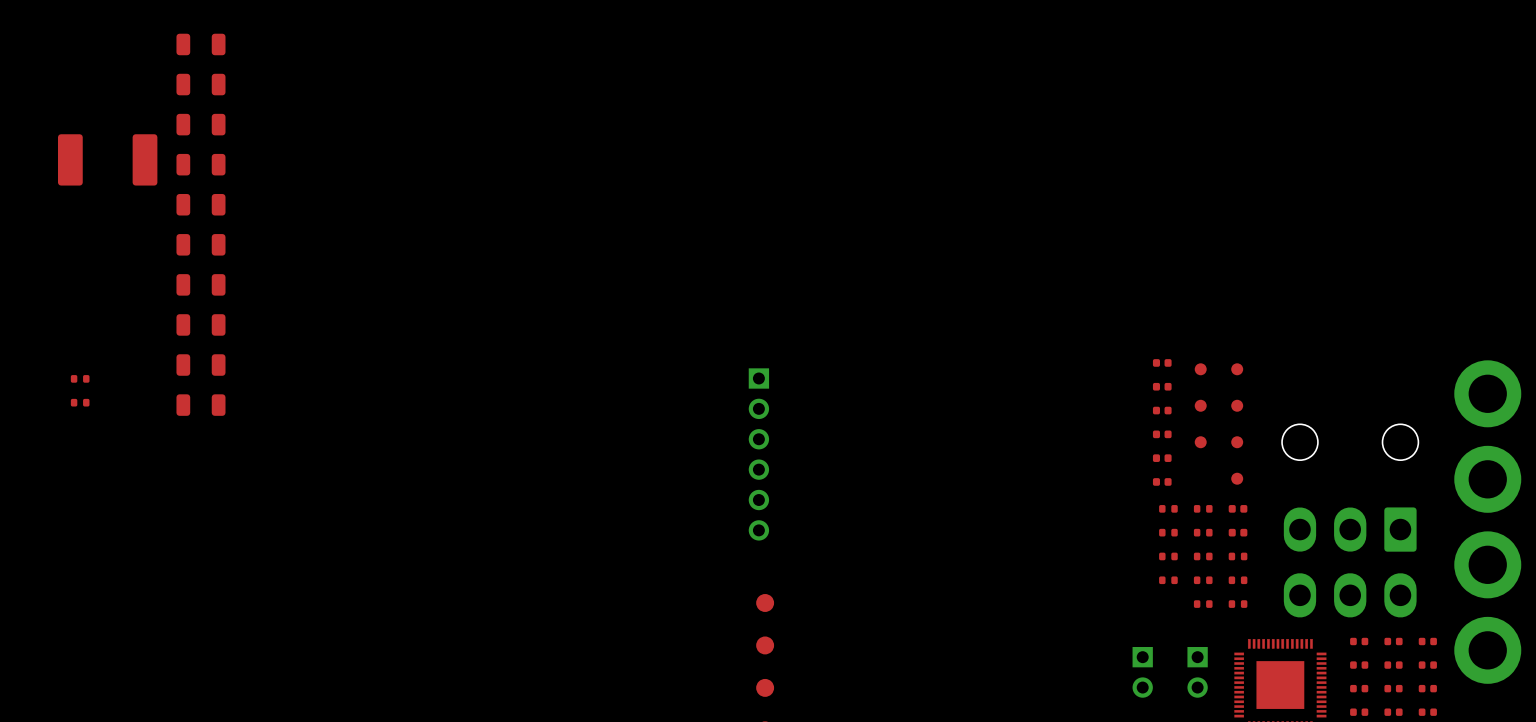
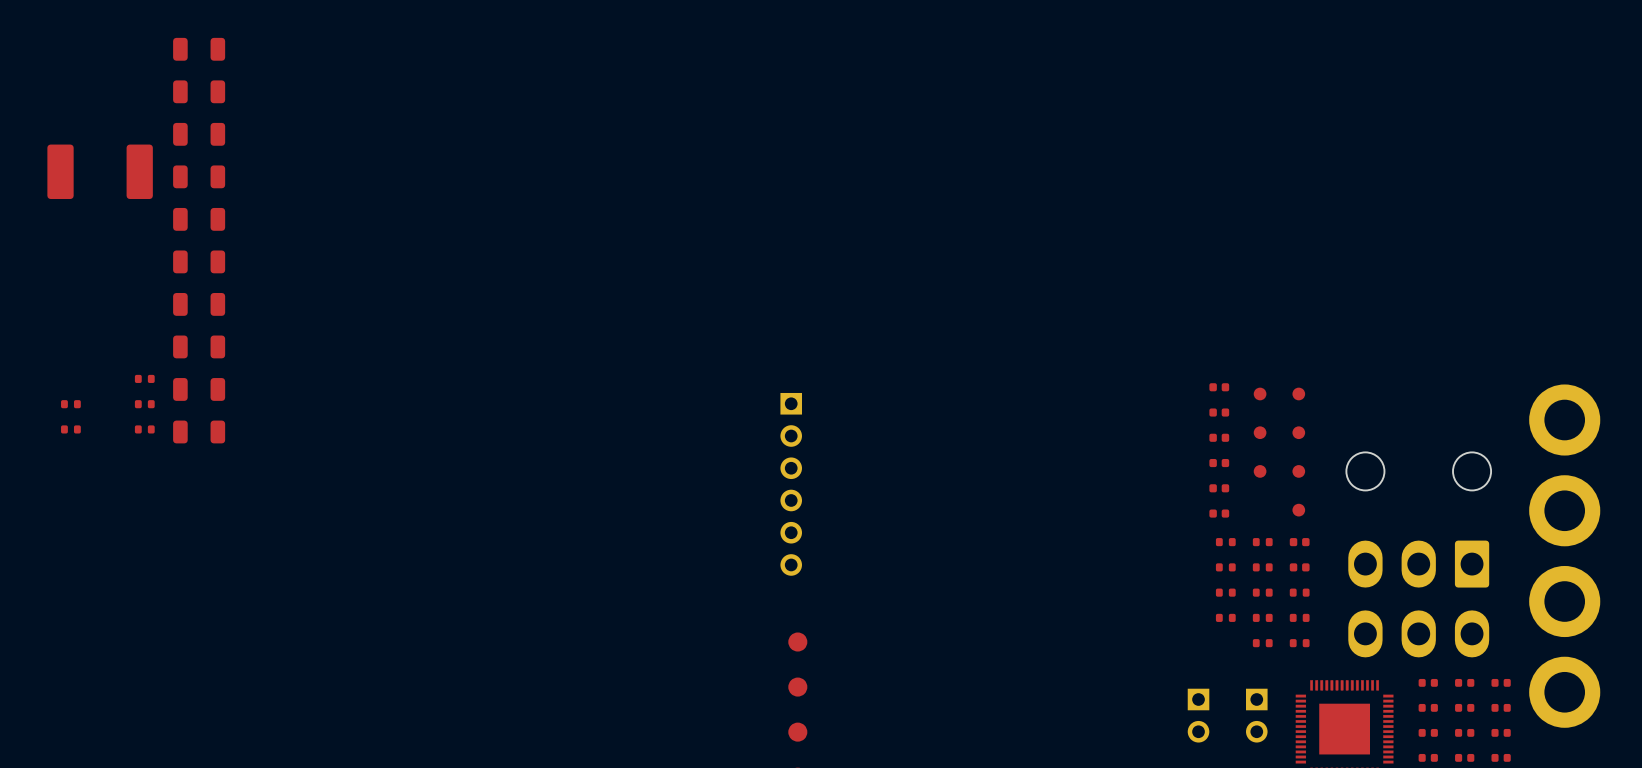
part: none -> (144, 378)
part: none -> (144, 404)
part: none -> (144, 429)

